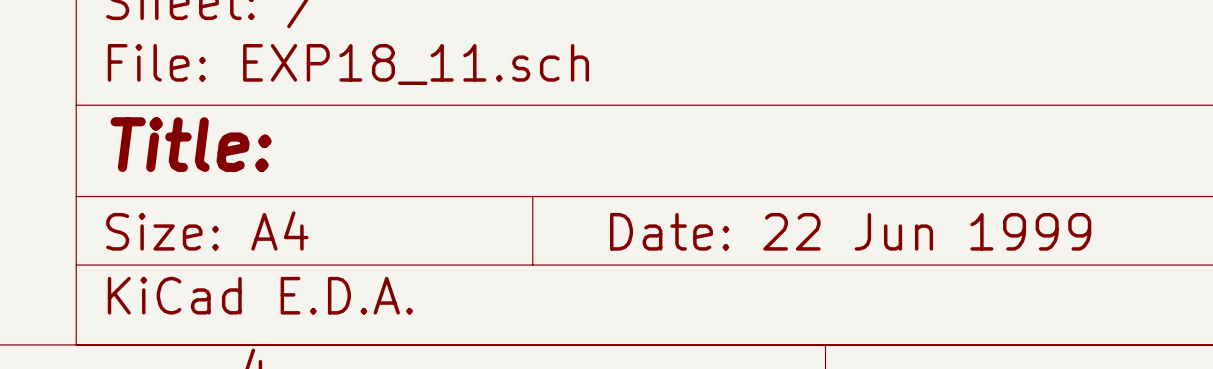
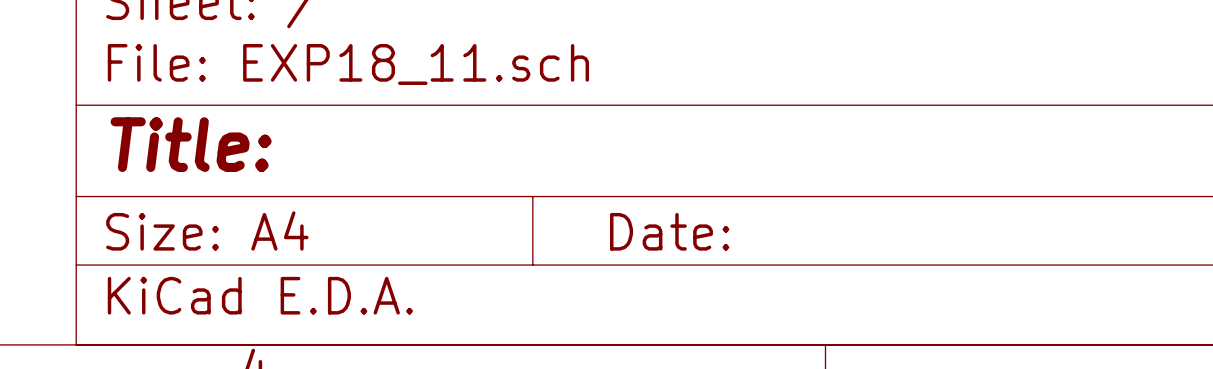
title block: Date: 22 Jun 1999 (850, 231) -> Date: (669, 231)

